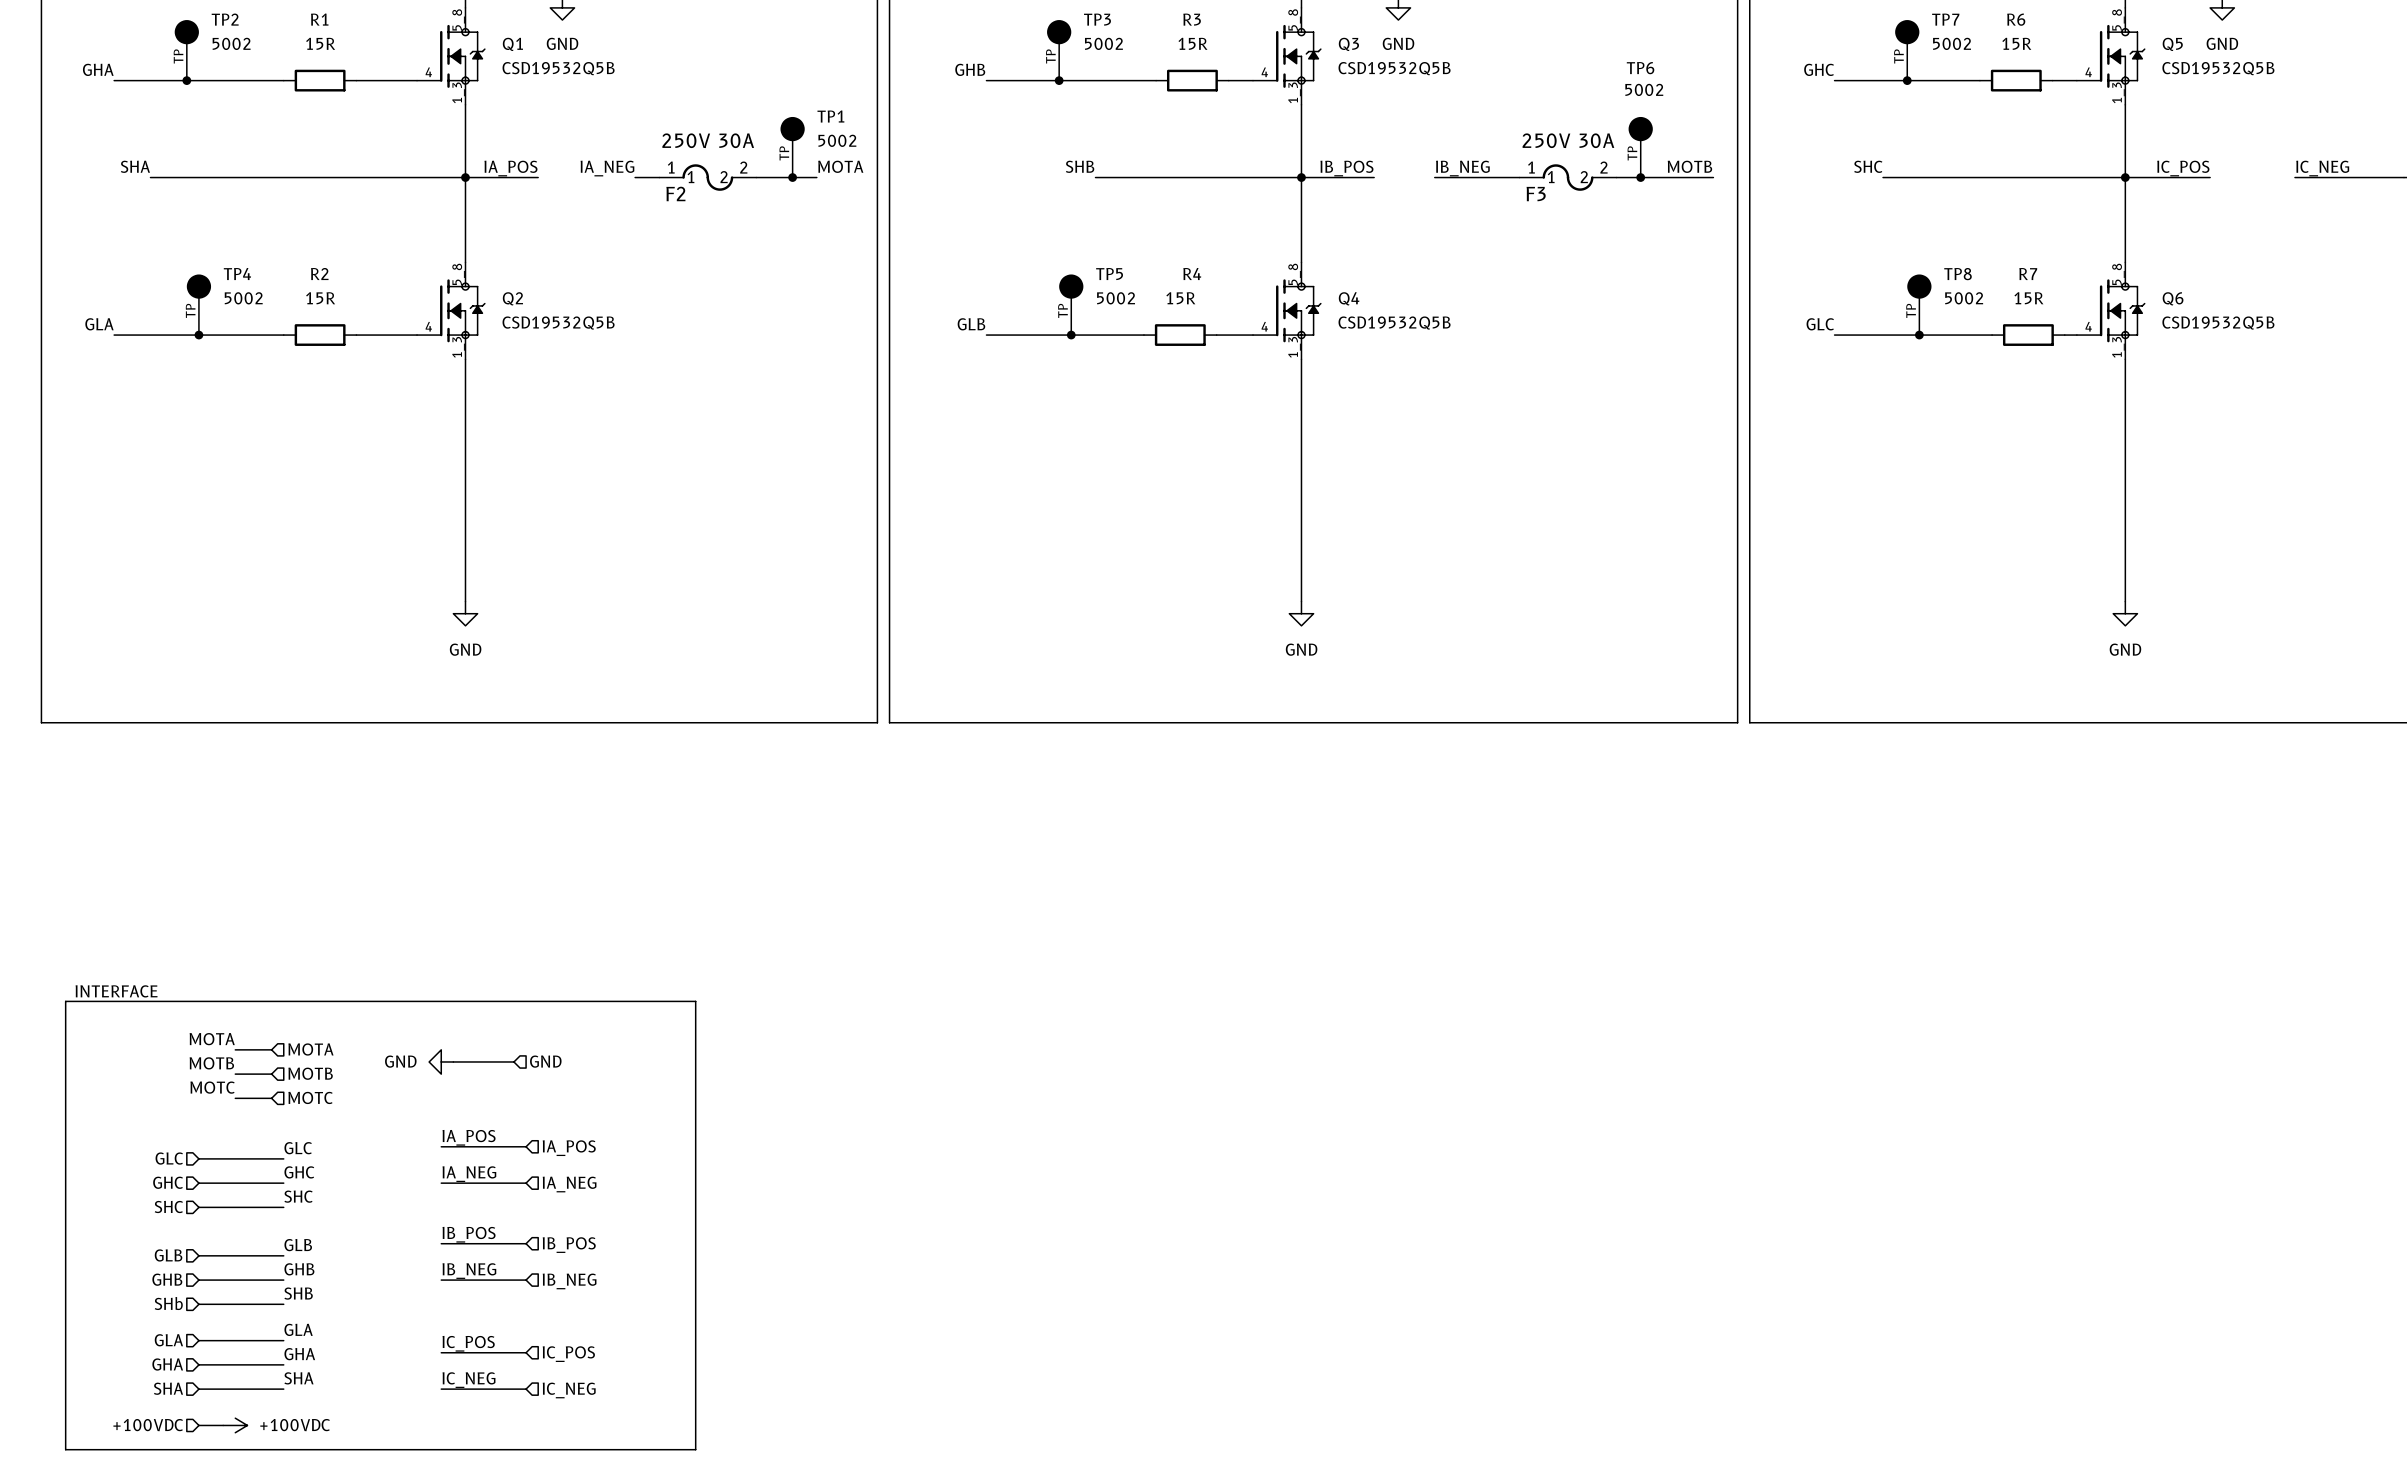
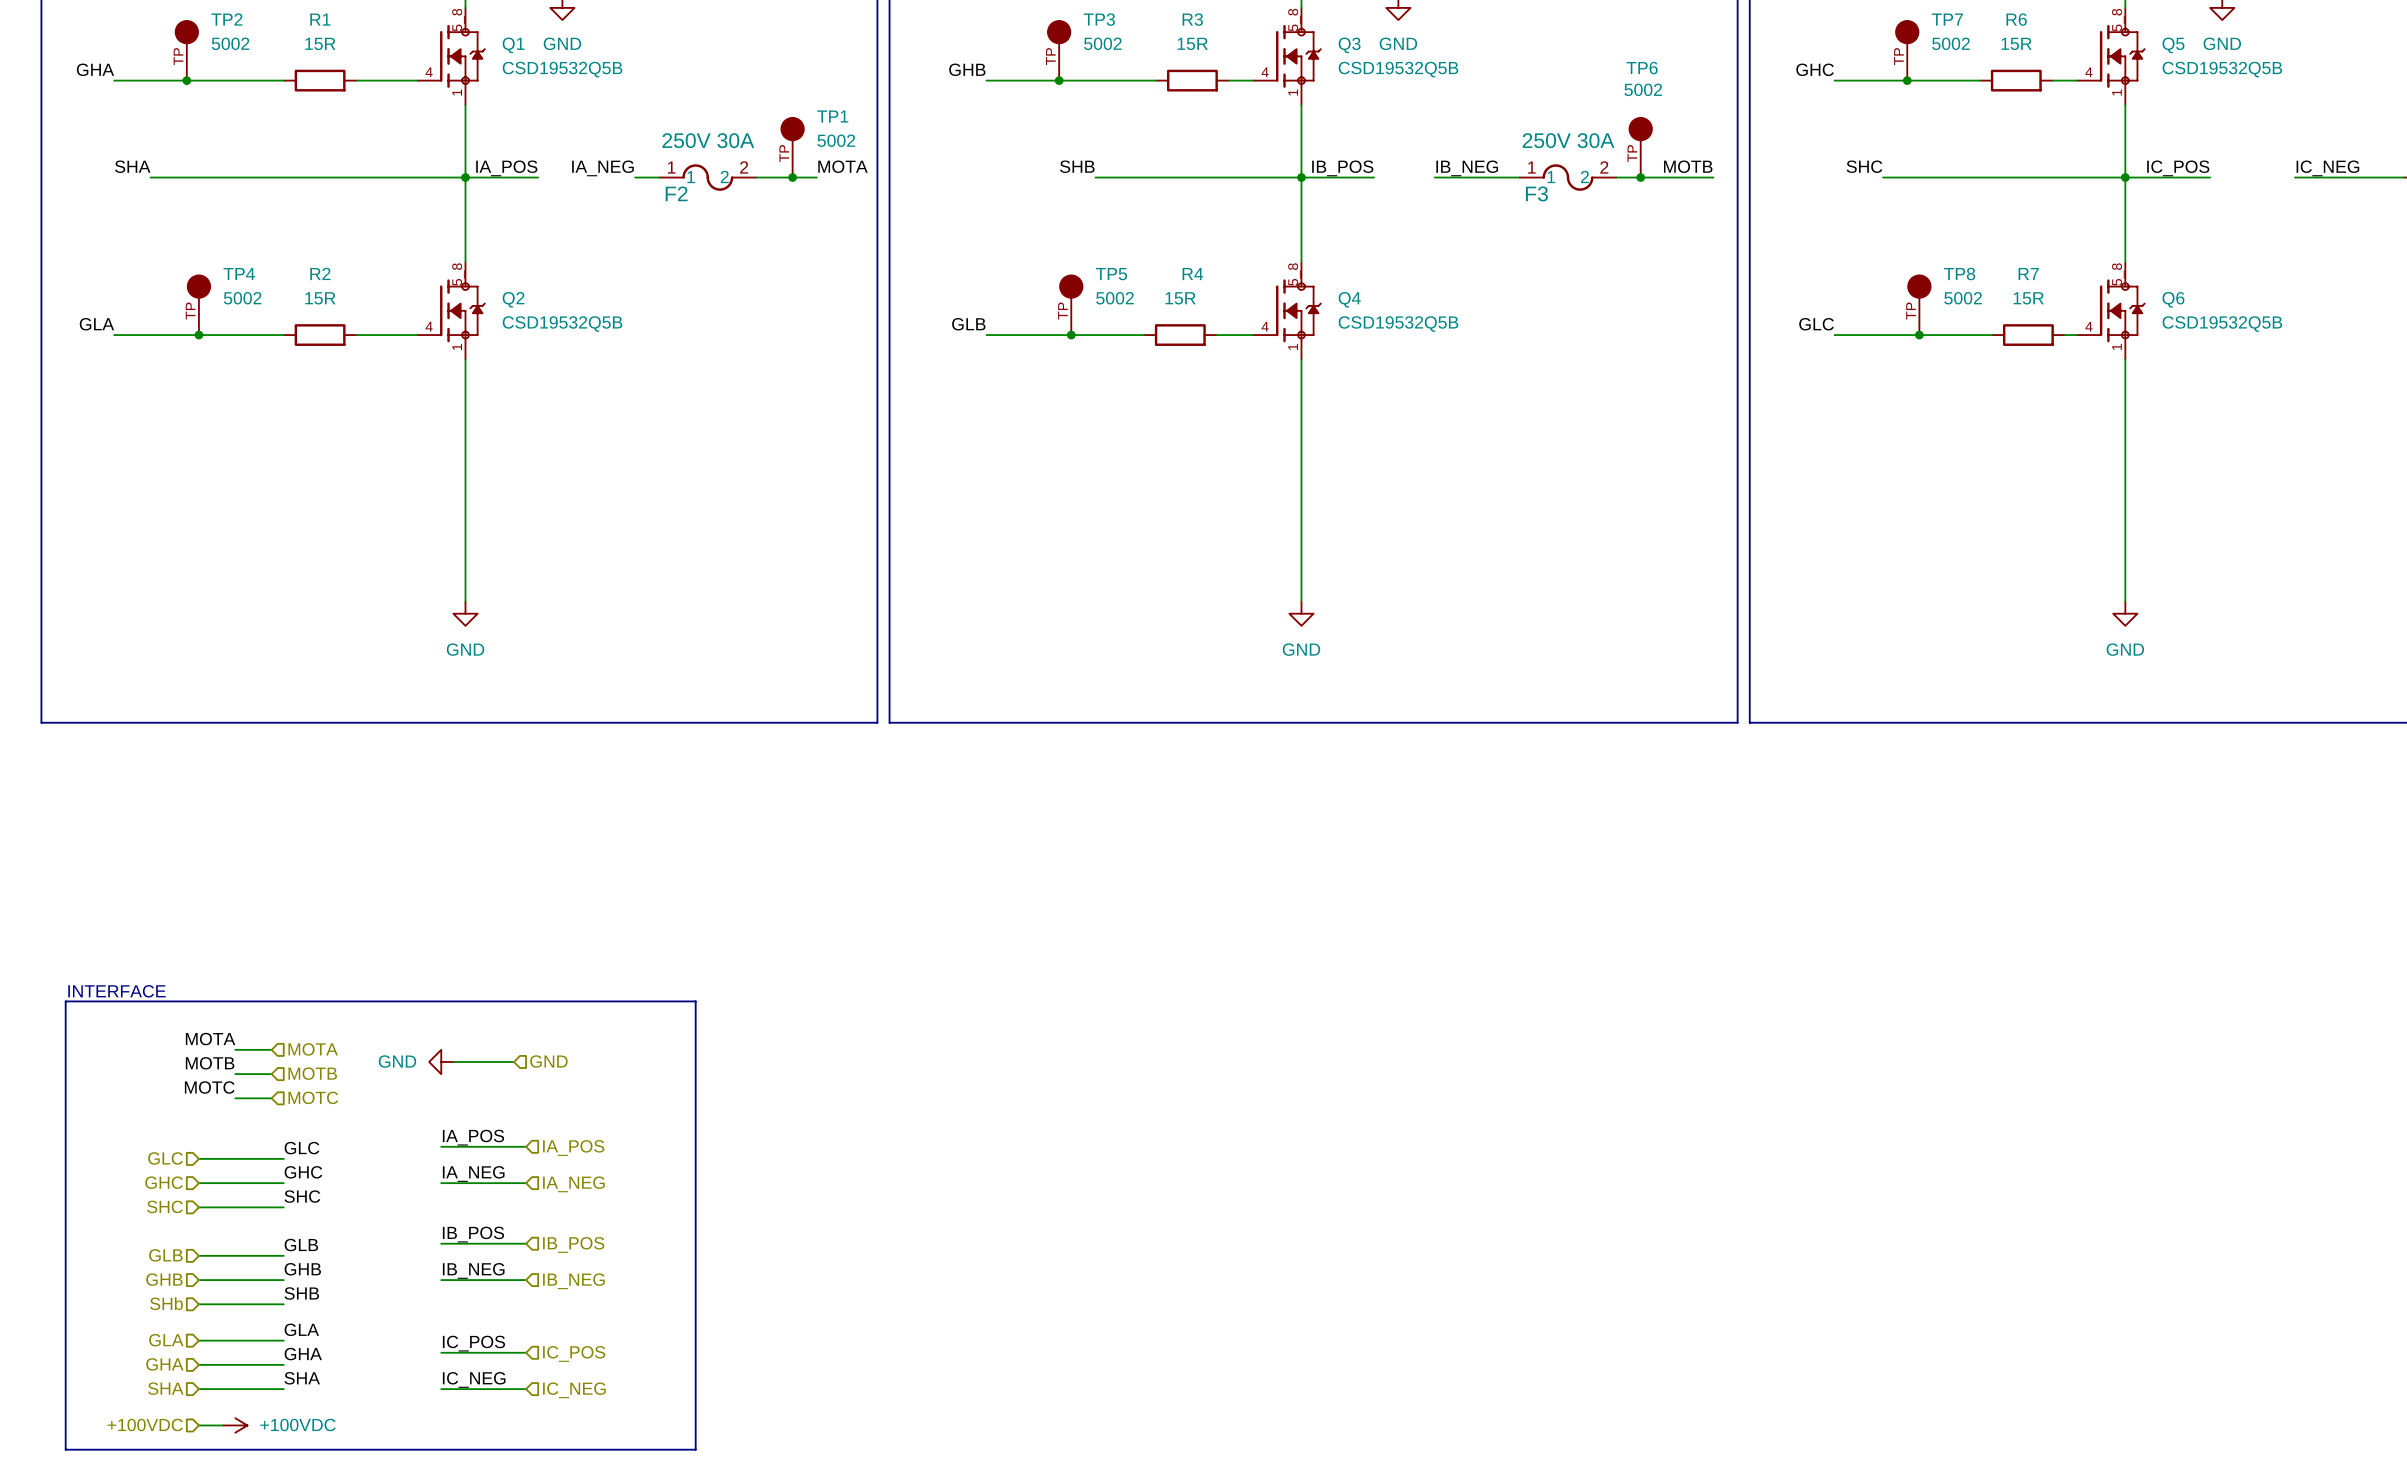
Q1 pin number: 1_3 (458, 92) -> 1 (457, 92)
Q3 pin number: 1_3 (1294, 92) -> 1 (1293, 92)
Q5 pin number: 1_3 (2118, 92) -> 1 (2117, 92)
Q2 pin number: 1_3 (458, 347) -> 1 (457, 346)
Q4 pin number: 1_3 (1294, 347) -> 1 (1293, 346)
Q6 pin number: 1_3 (2118, 347) -> 1 (2117, 346)

